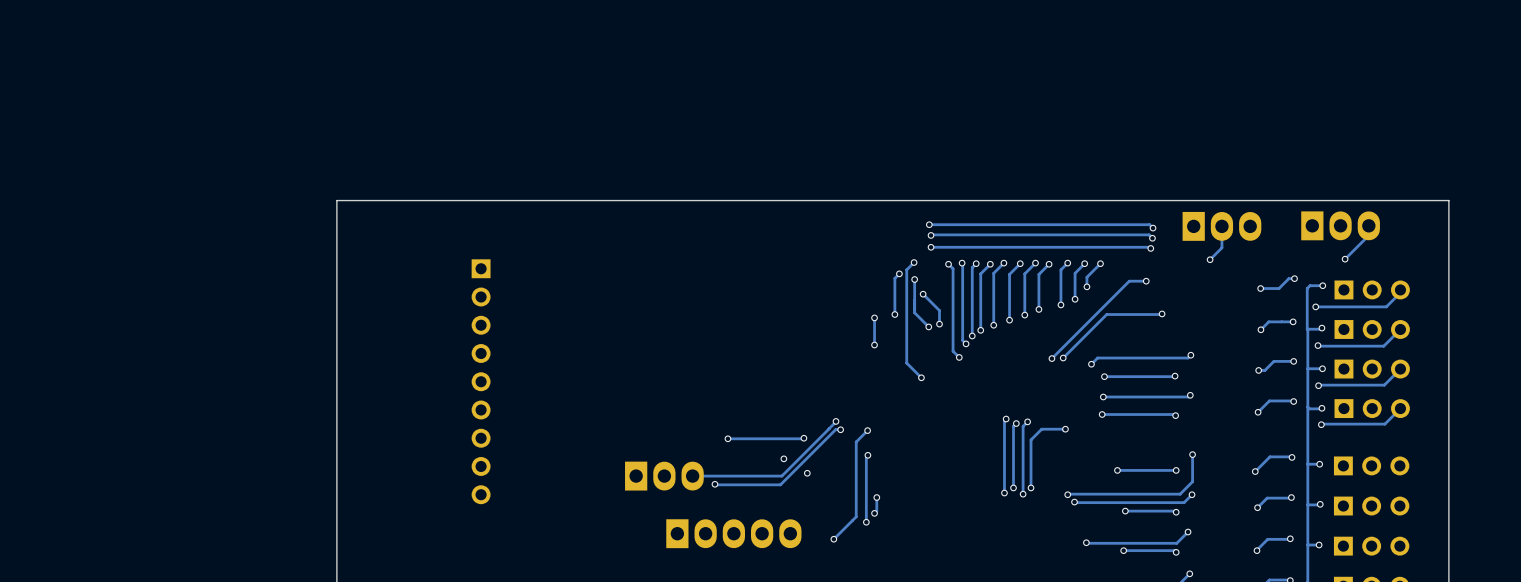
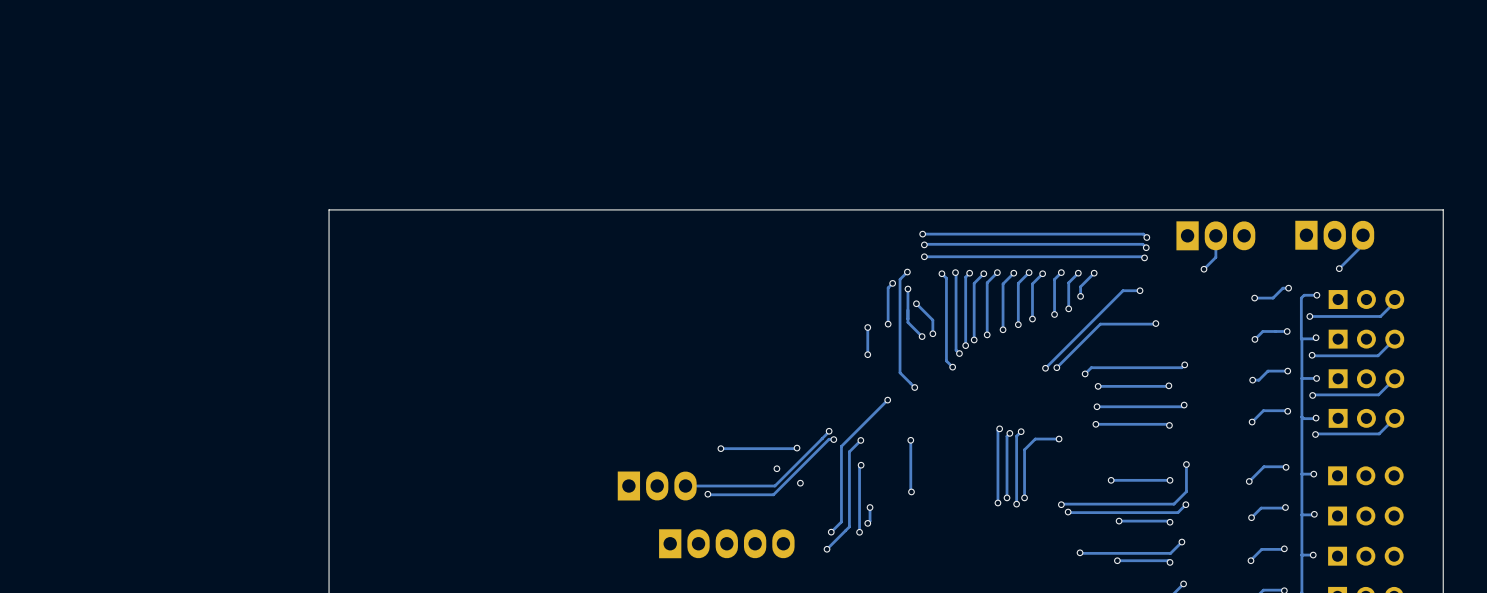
part: (481, 381) -> none
track: none -> (887, 400) (841, 446) (841, 521) (831, 532)
via: none -> (887, 400)
track: none -> (910, 440) (911, 491)
via: none -> (910, 440)
via: none -> (911, 491)
via: none -> (831, 532)

